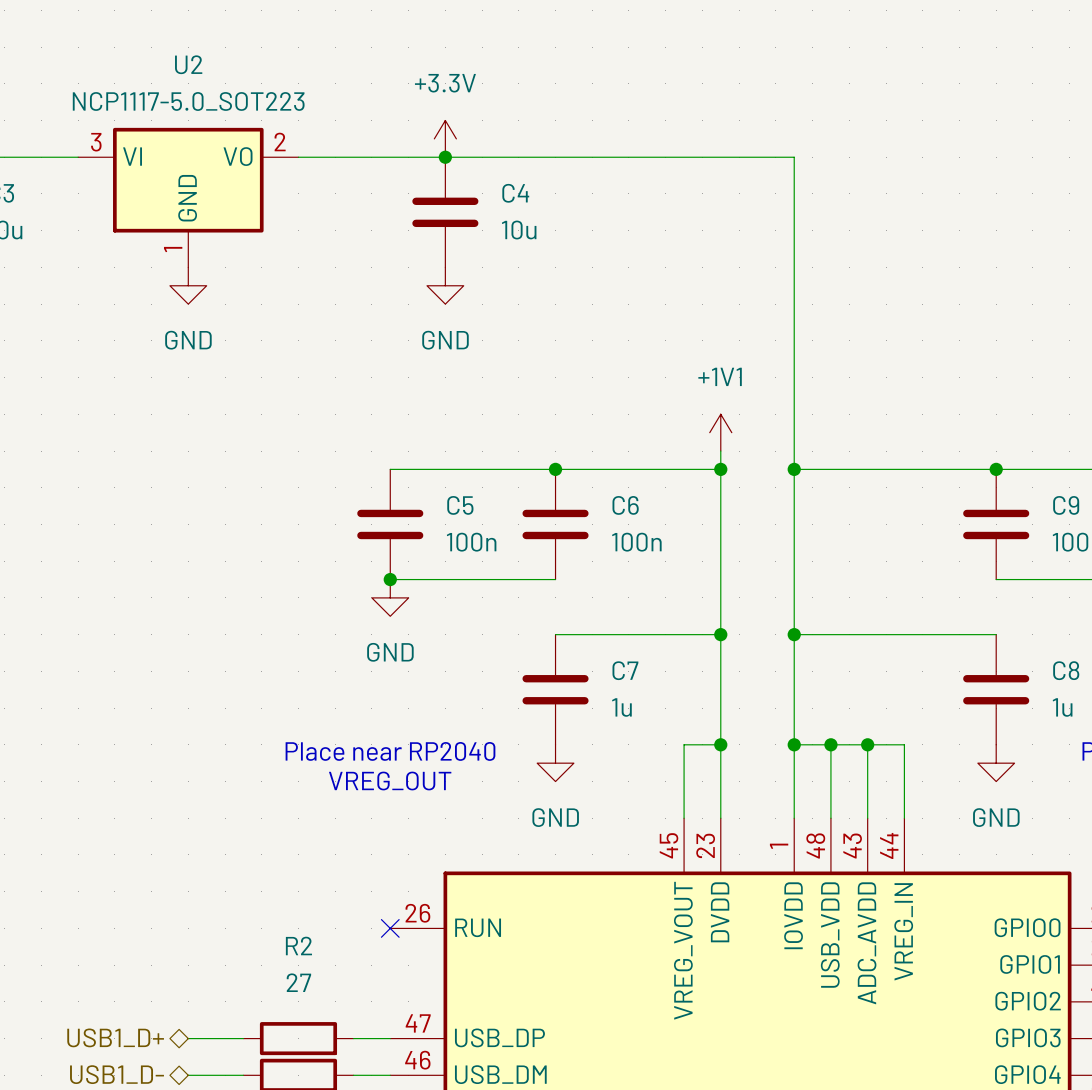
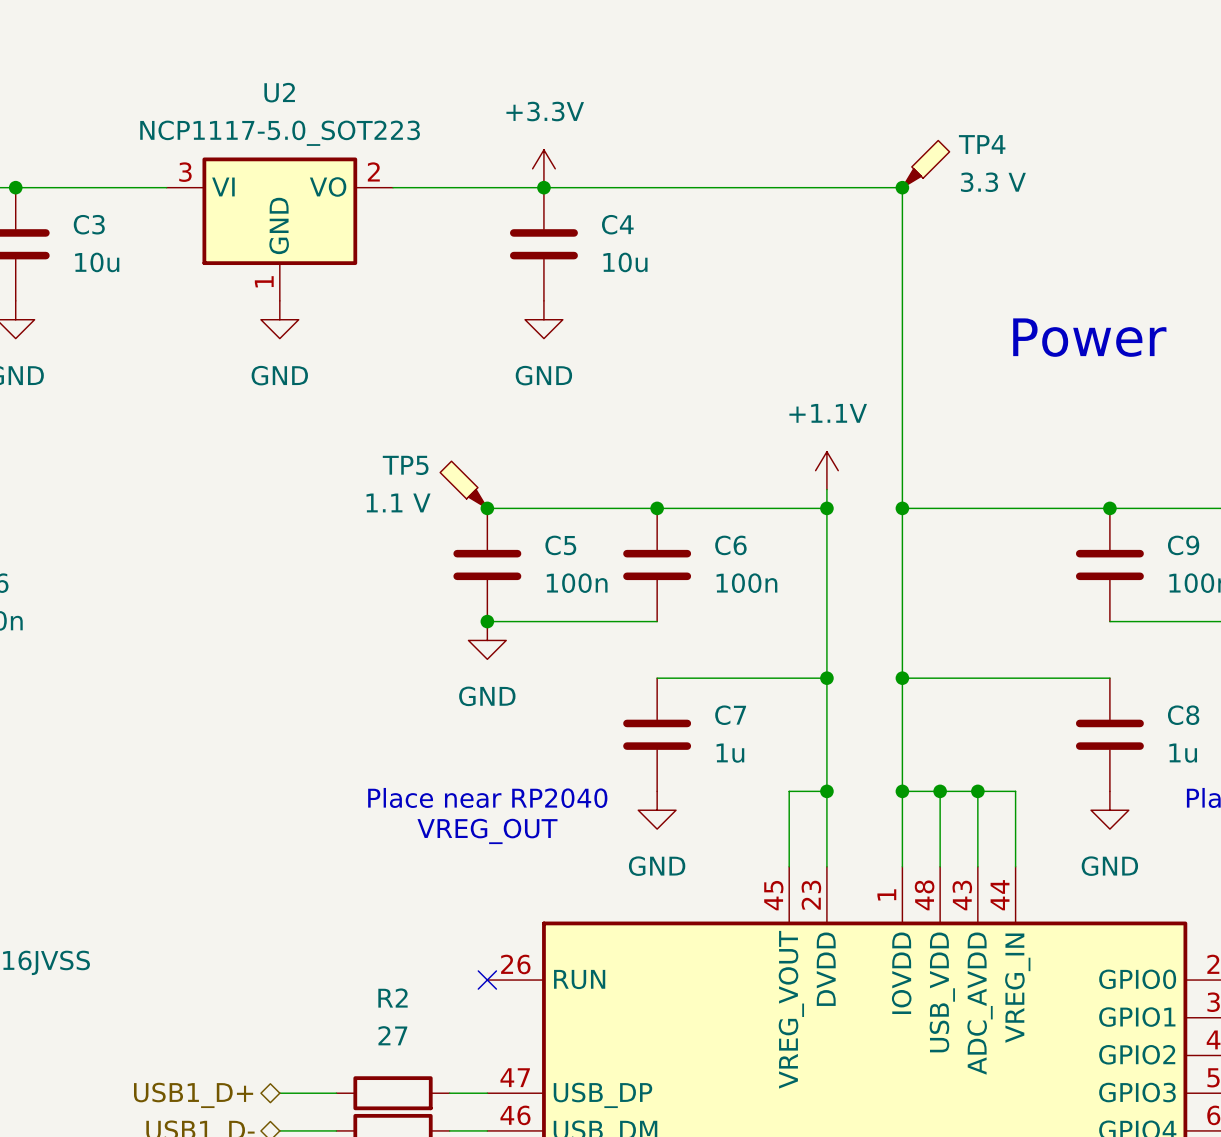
TP4: none -> 3.3 V (925, 164)
junction: none -> (902, 187)
text: none -> Power (1089, 337)
power symbol: +1V1 (720, 432) -> +1.1V (826, 470)
TP5: none -> 1.1 V (463, 484)
junction: none -> (487, 508)

